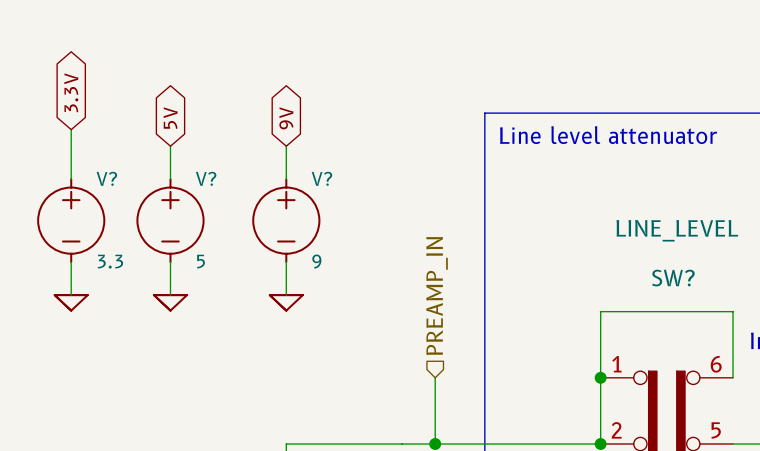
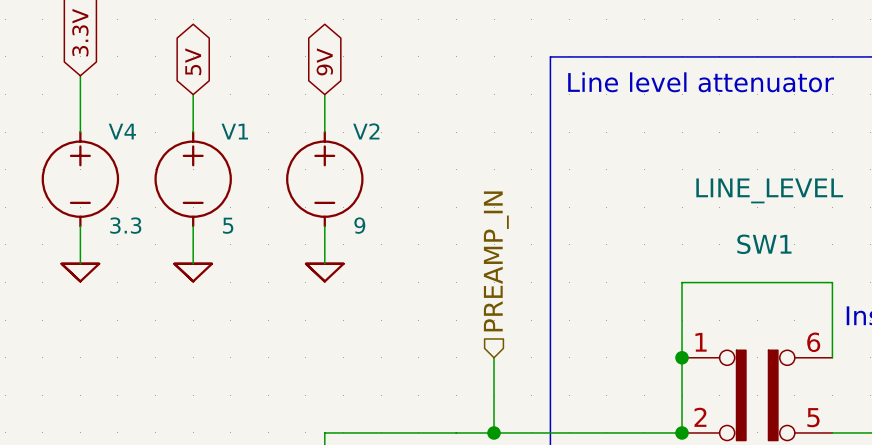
V? name: V? (106, 178) -> V4 (122, 131)
V? name: V? (206, 178) -> V1 (234, 131)
V? name: V? (321, 178) -> V2 (366, 131)
SW? name: SW? (673, 278) -> SW1 (764, 244)

